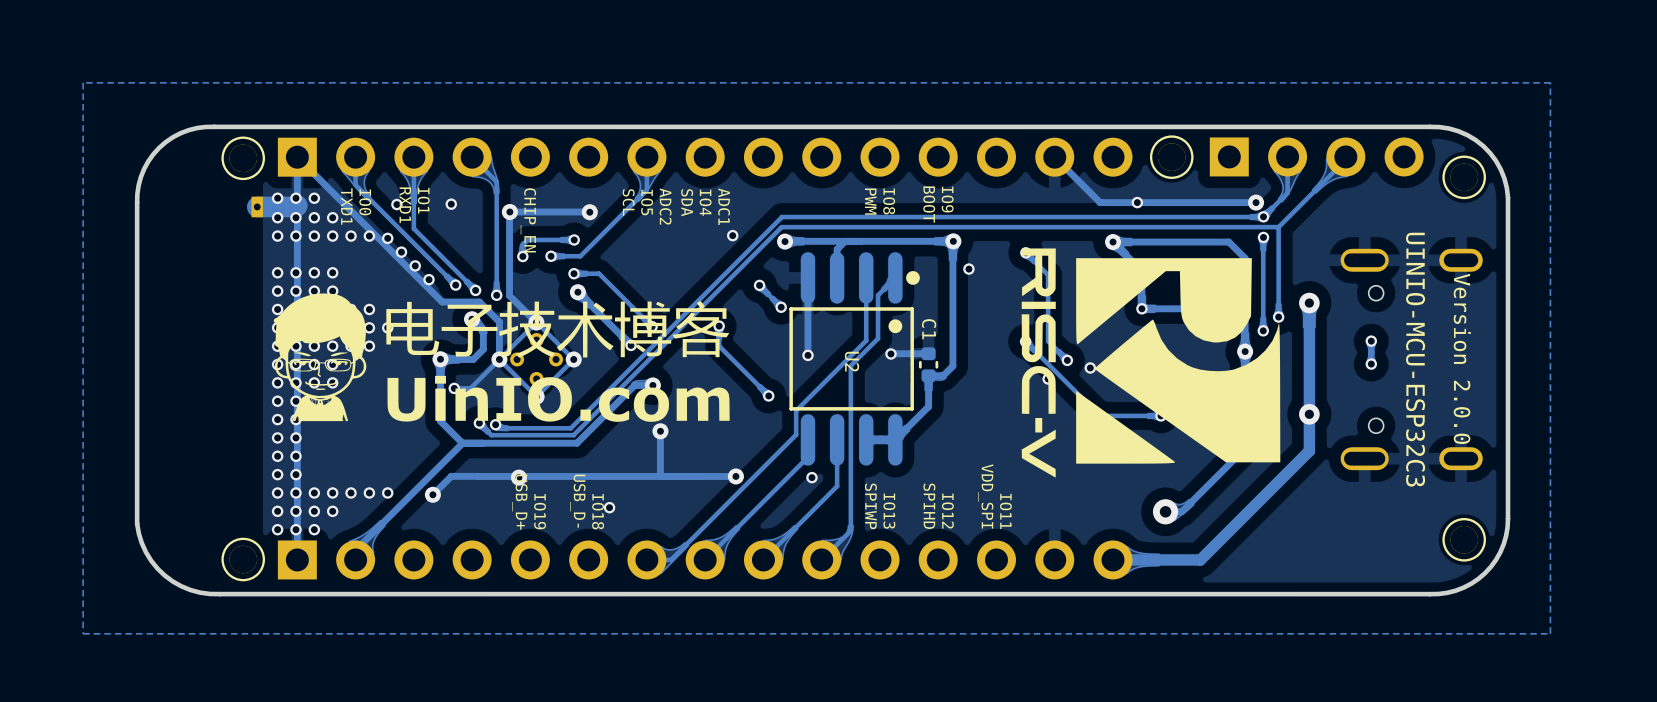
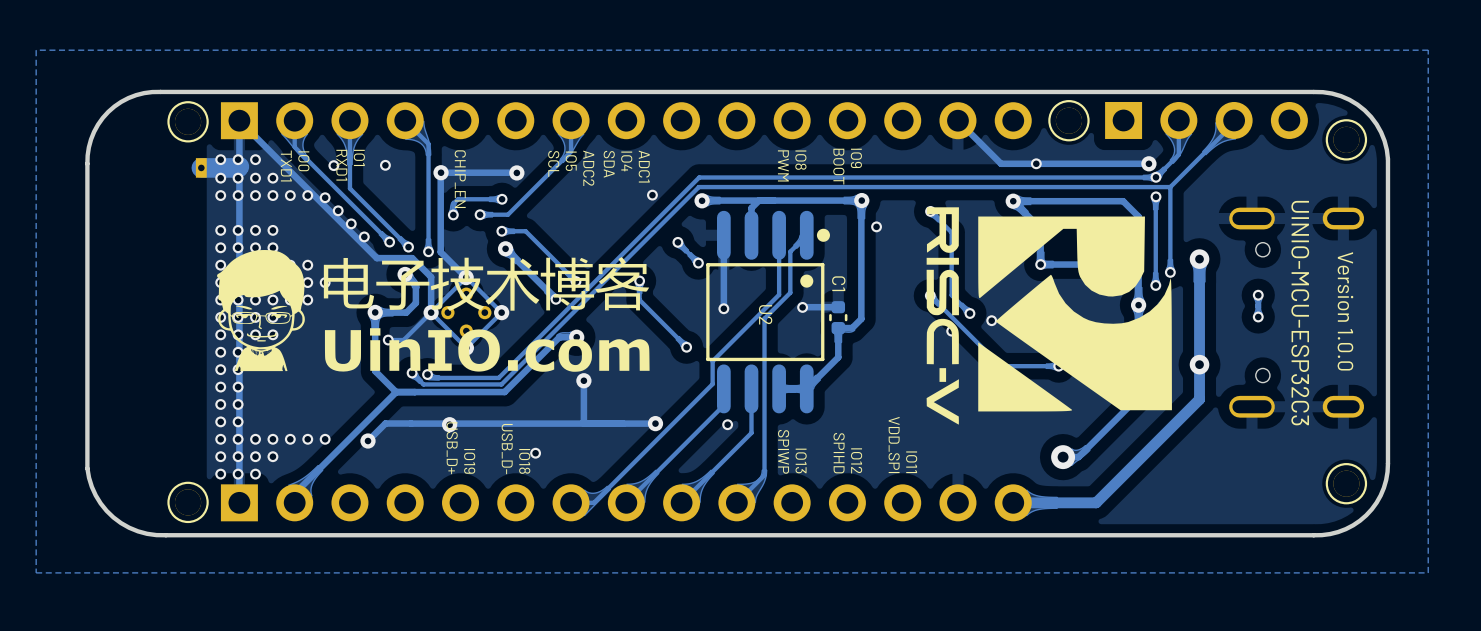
text: Version 2.0.0 (1462, 358) -> Version 1.0.0 (1345, 311)

